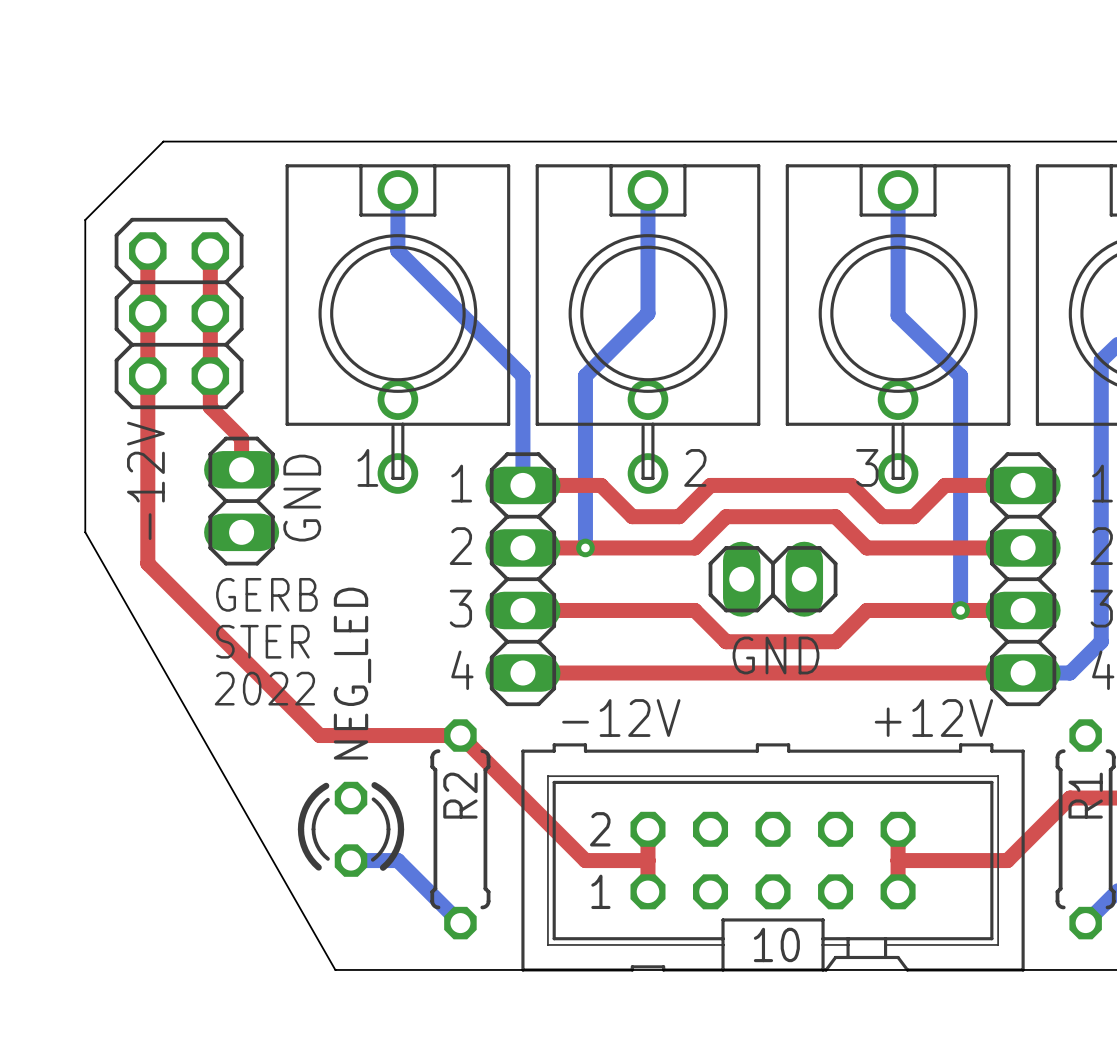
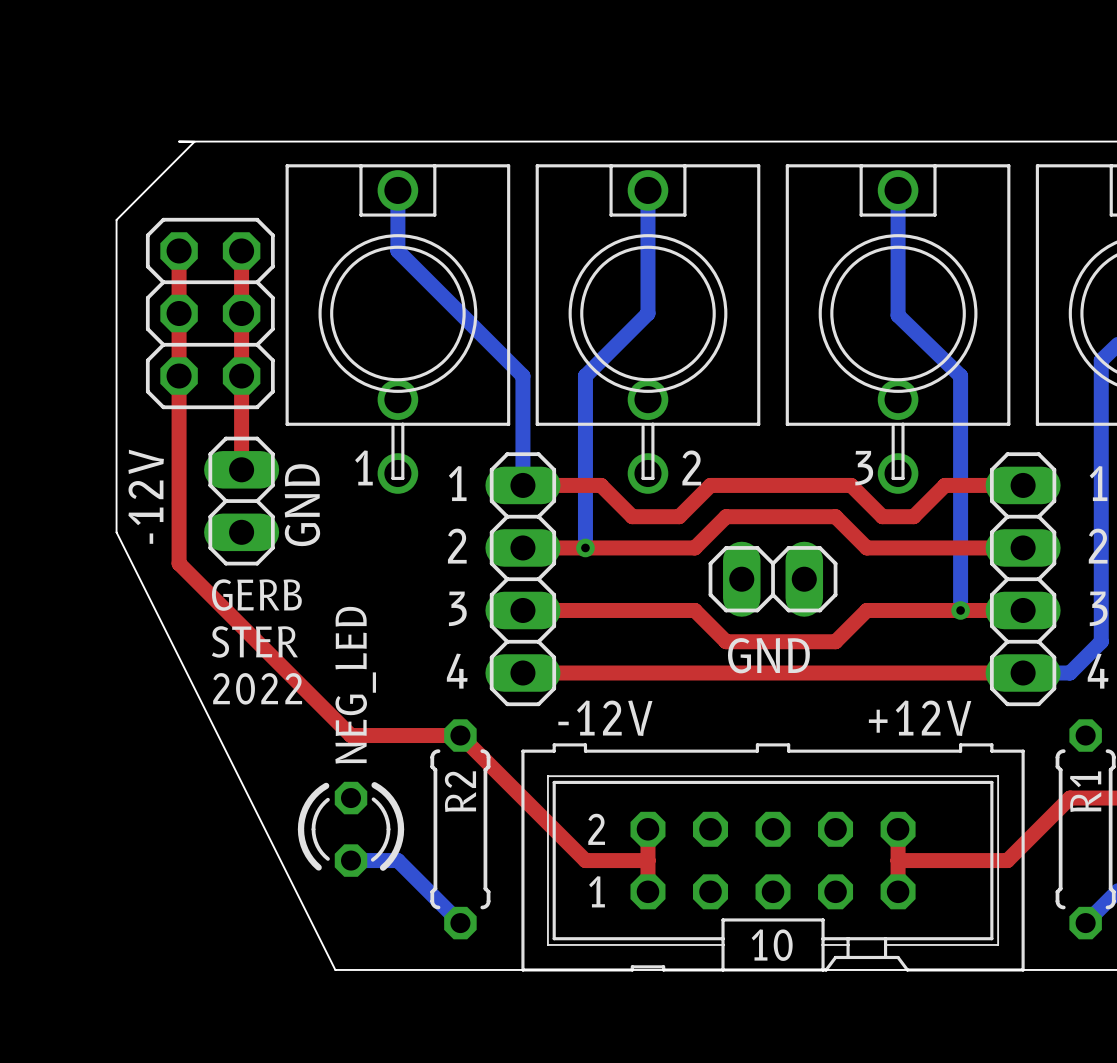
board edge: (163, 141) (85, 219) (85, 532) (335, 969) -> (179, 141) (194, 141) (116, 219) (116, 532) (335, 969)
board edge: (163, 141) (179, 141) -> none
top track: (147, 250) (147, 563) (319, 735) (351, 735) -> (179, 250) (179, 563) (351, 735)
top track: (210, 250) (210, 407) (241, 438) -> (241, 250) (241, 438)
part position: (179, 313) -> (210, 313)

